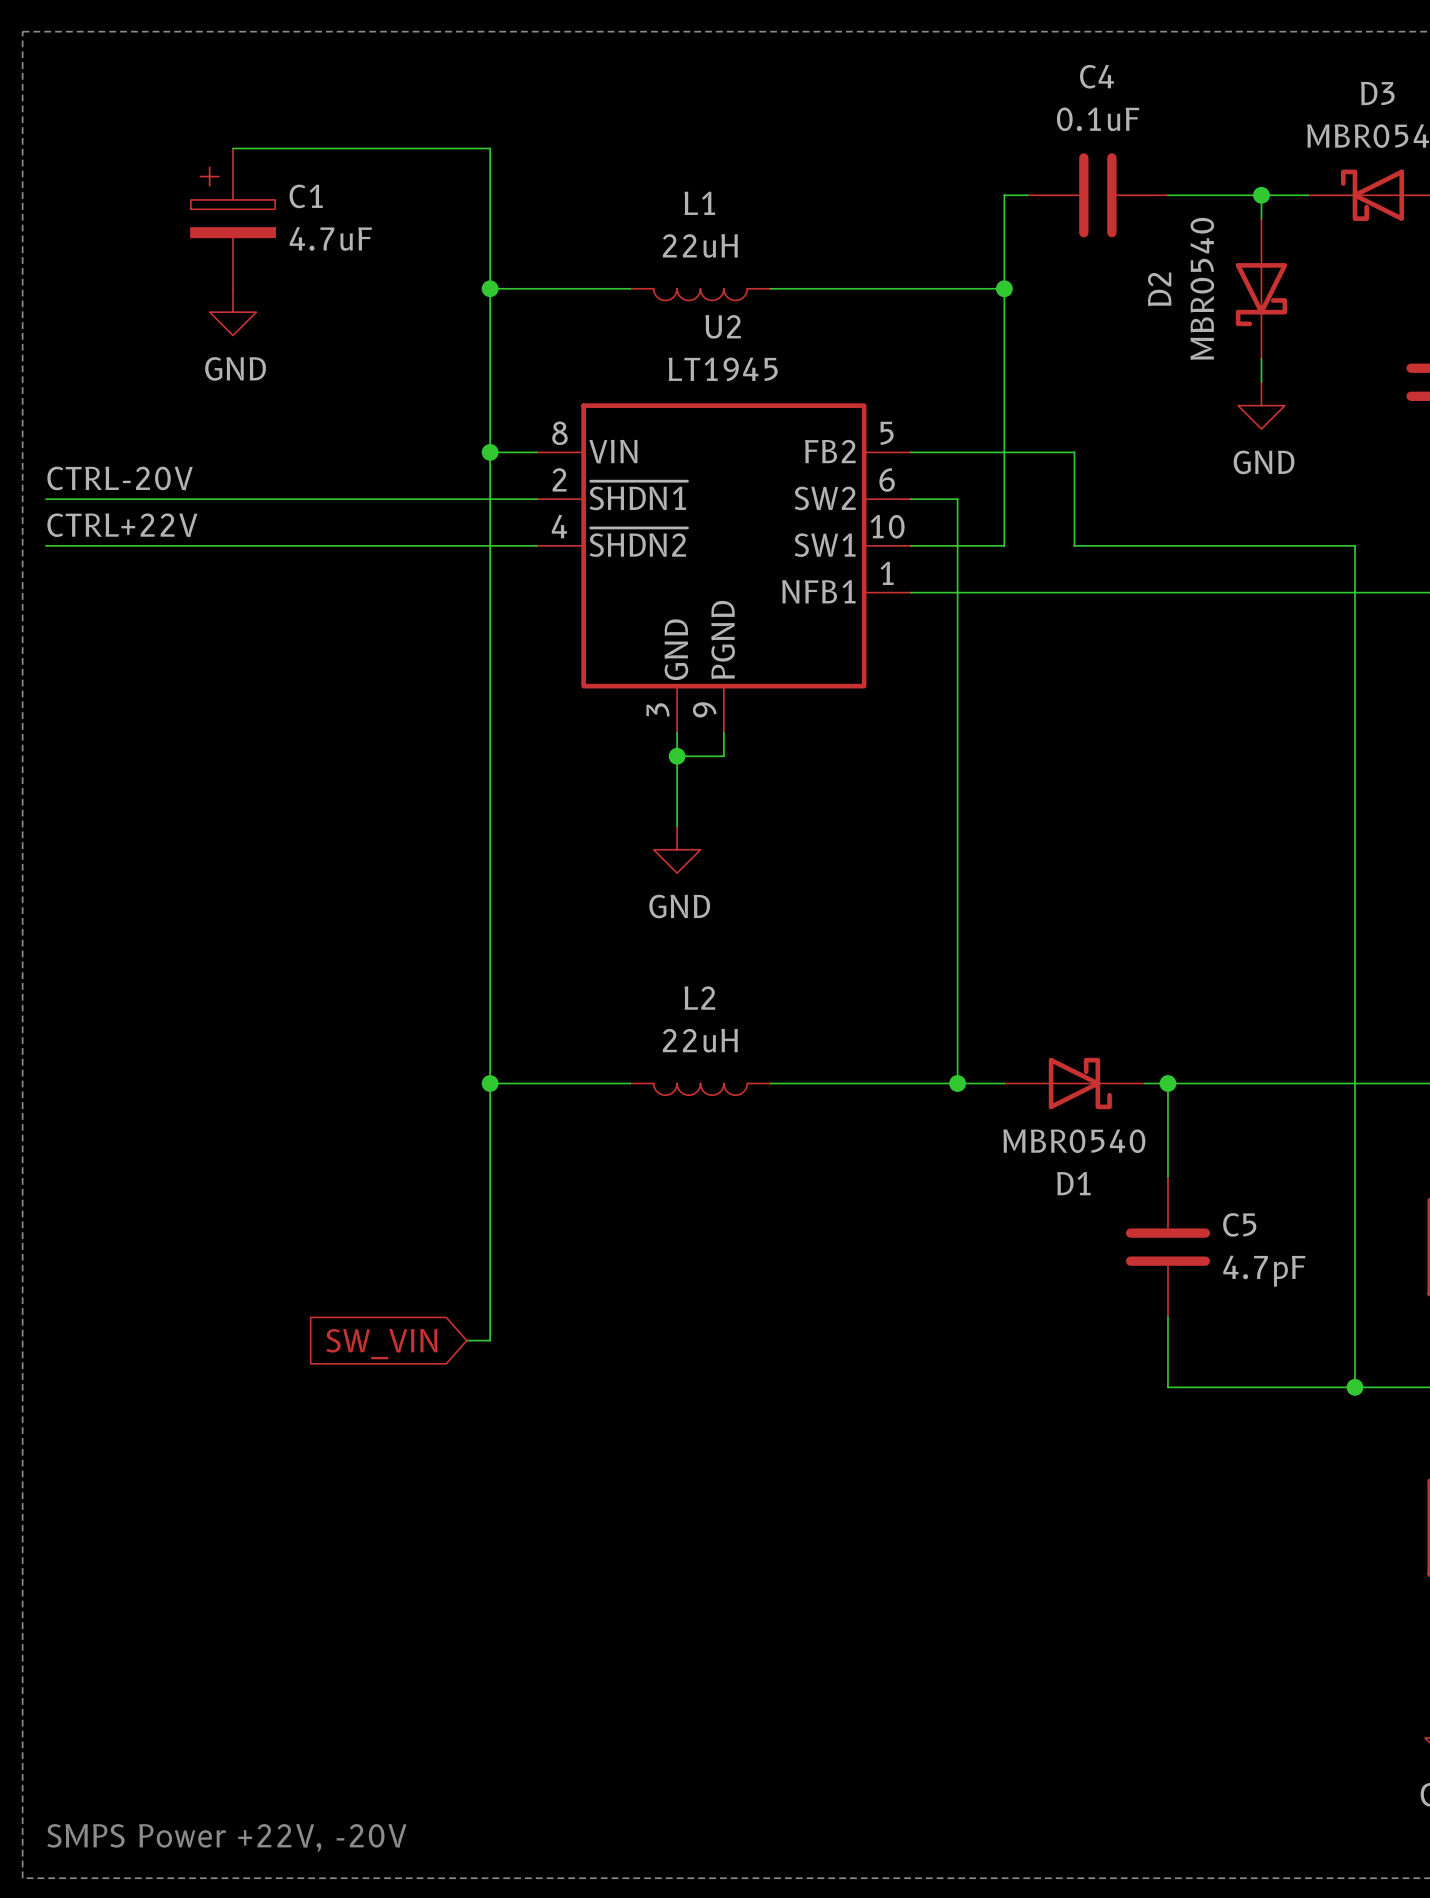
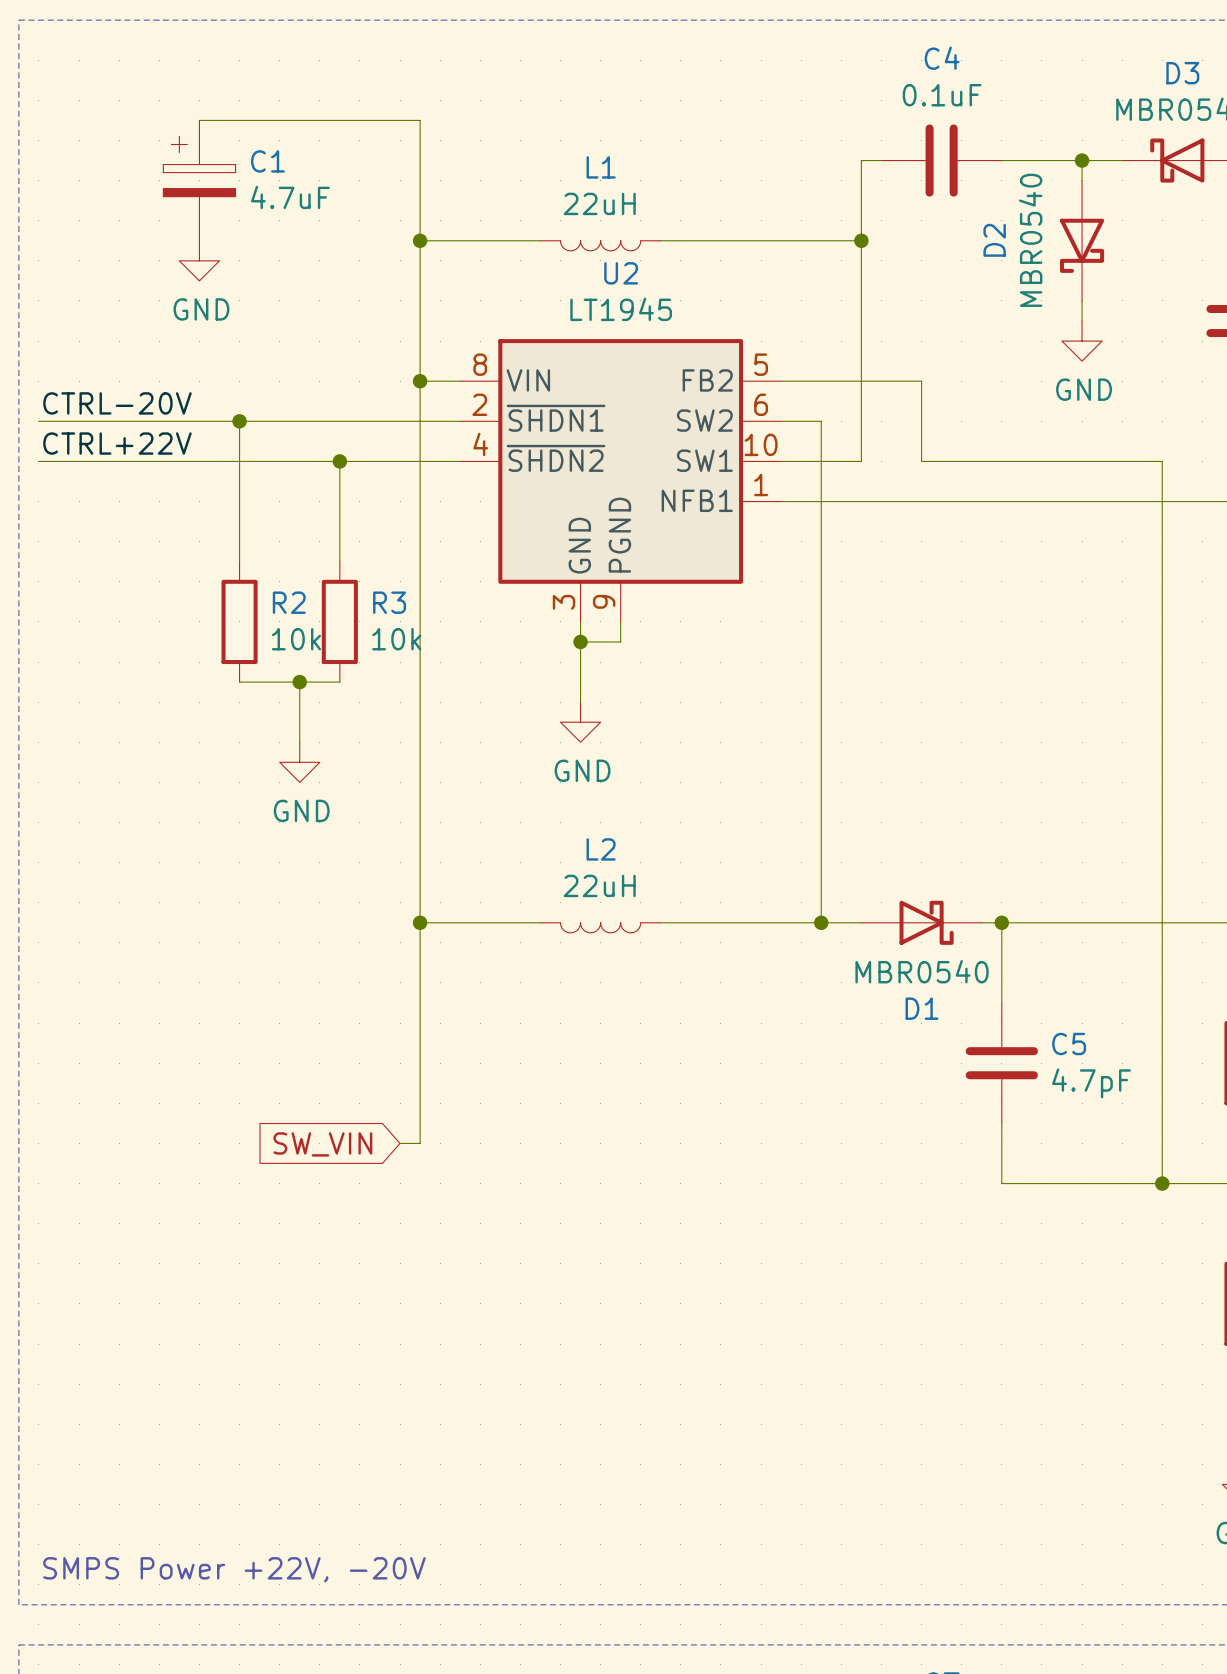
wire: none -> (239, 421) (239, 561)
junction: none -> (239, 421)
wire: none -> (339, 461) (339, 561)
junction: none -> (339, 461)
R2: none -> 10k (239, 621)
R3: none -> 10k (339, 621)
wire: none -> (239, 682) (339, 682)
wire: none -> (299, 682) (299, 742)
junction: none -> (299, 682)
power symbol: none -> GND (299, 762)

